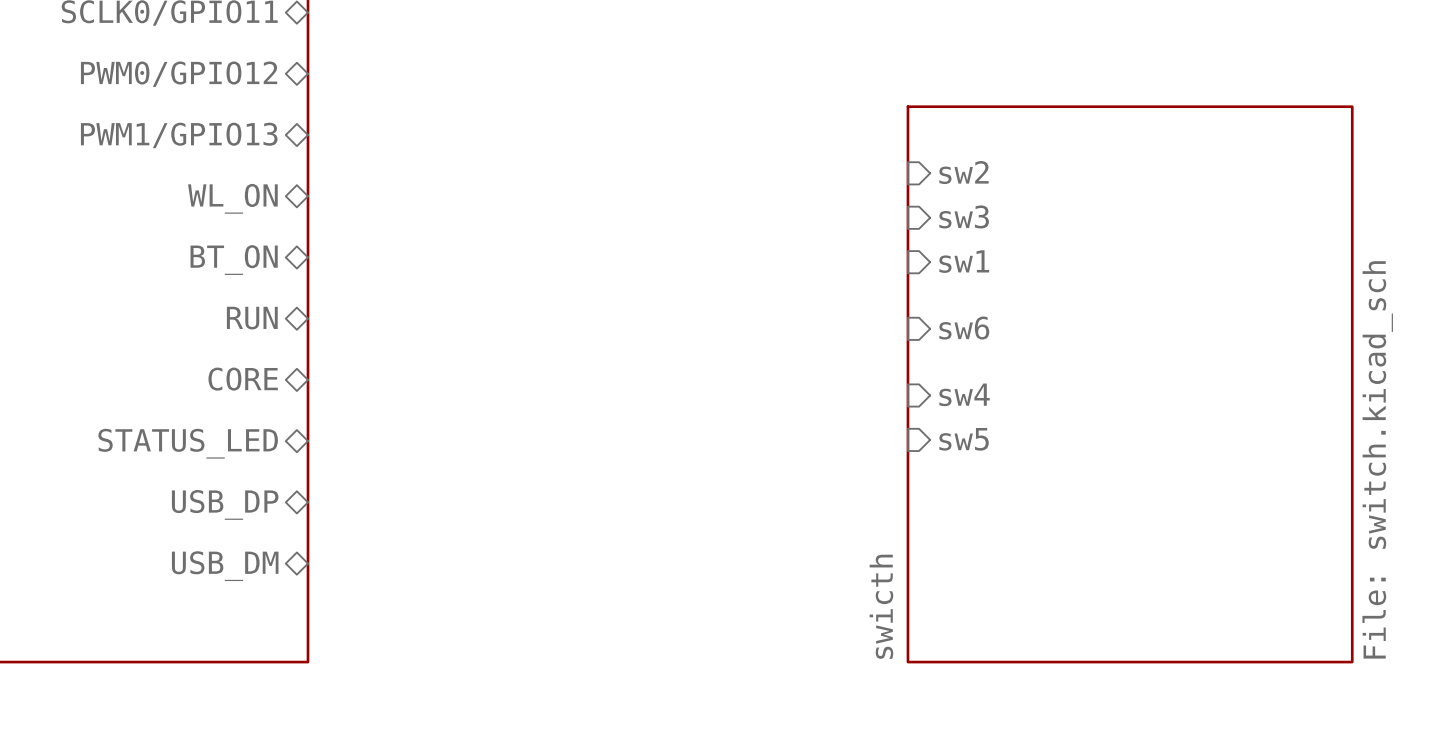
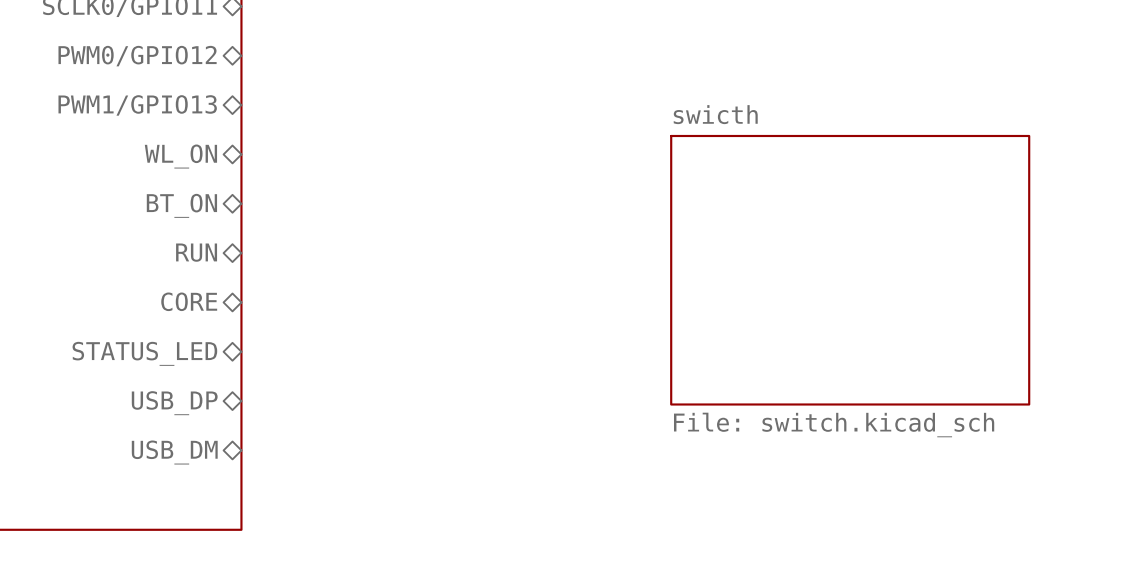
sheet pin: sw2 (963, 172) -> none
sheet pin: sw3 (964, 216) -> none
sheet pin: sw1 (964, 261) -> none
sheet pin: sw6 (964, 328) -> none
sheet swicth: none -> File: switch.kicad_sch (850, 270)
sheet swicth: File: switch.kicad_sch (1130, 384) -> none
sheet pin: sw4 (964, 394) -> none
sheet pin: sw5 (964, 439) -> none

